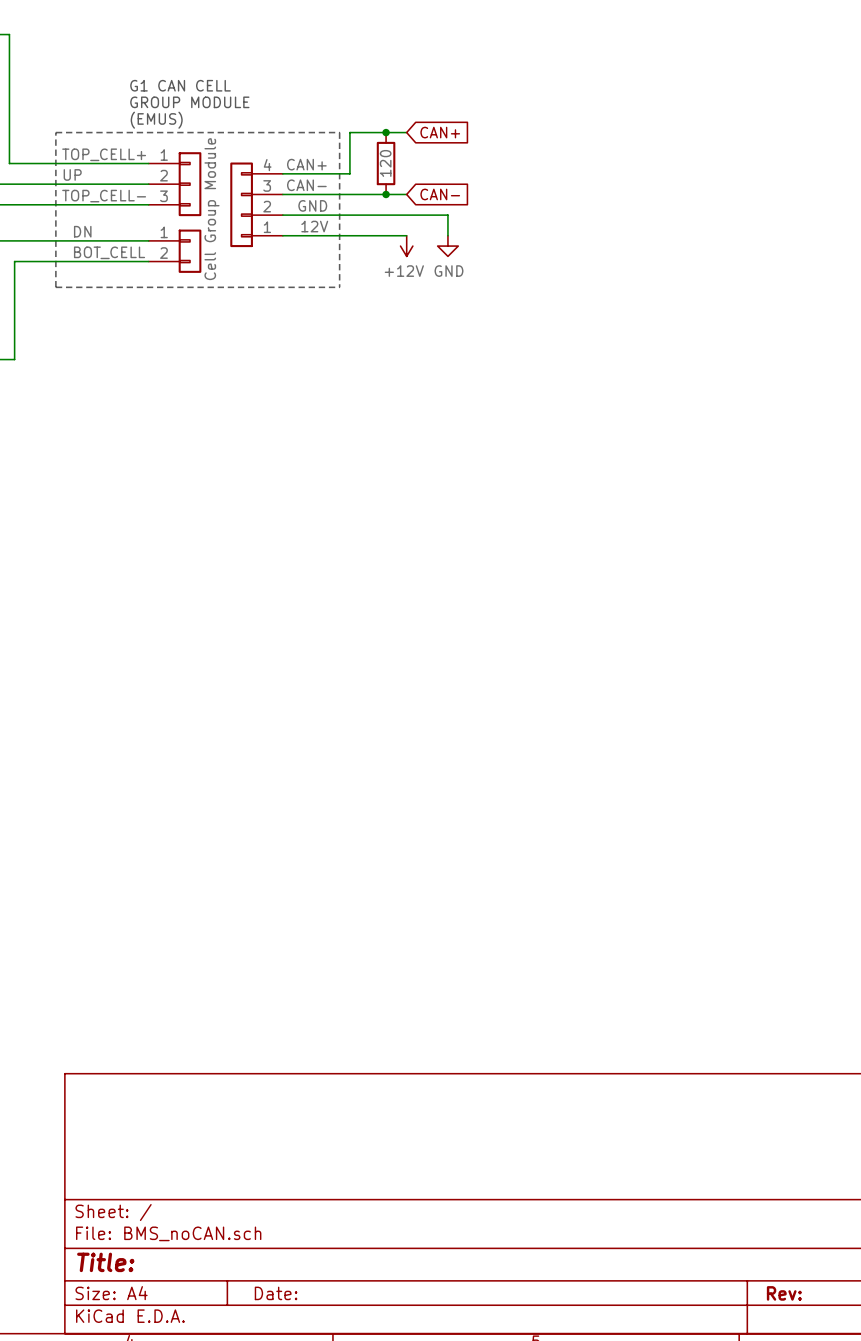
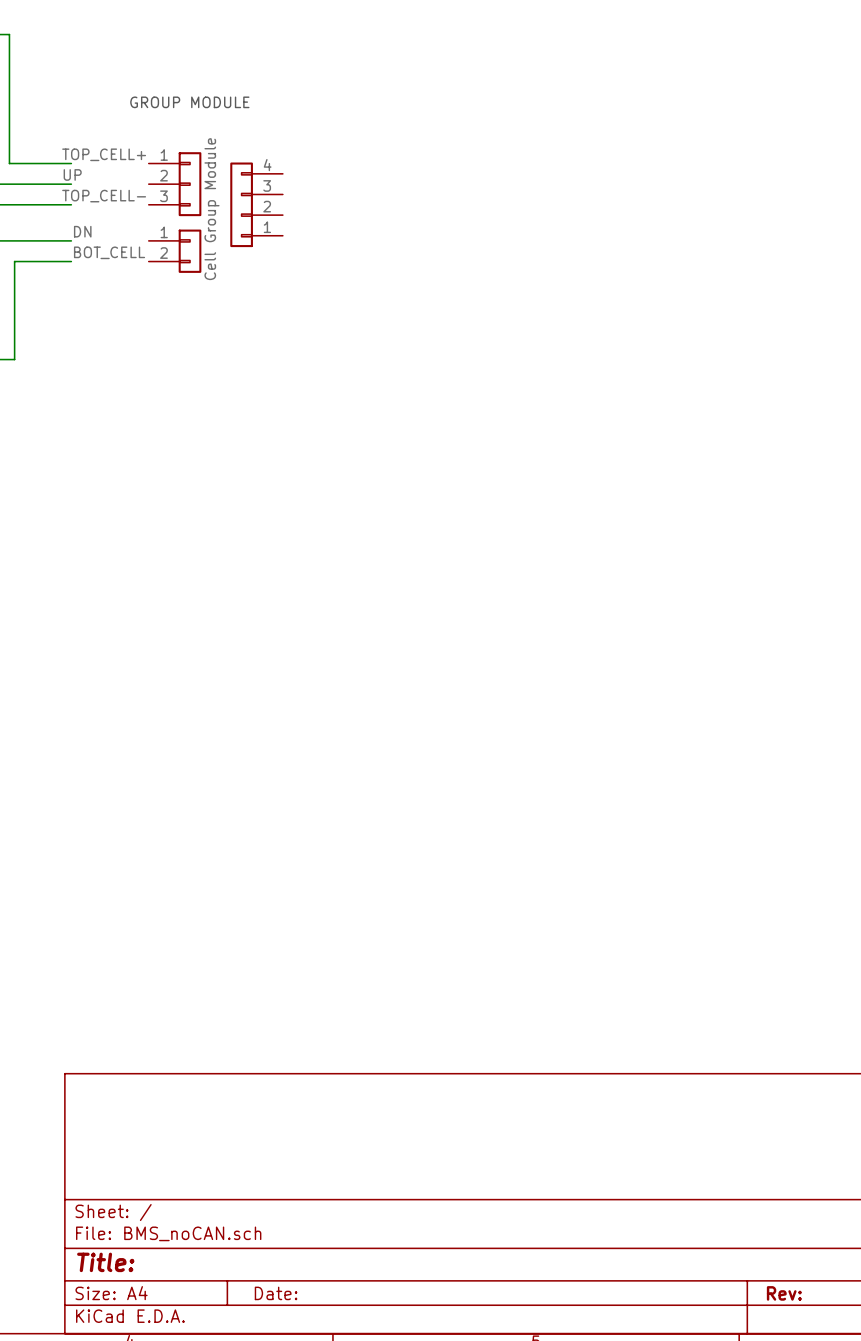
text: G1 CAN CELL (180, 85) -> none
text: (EMUS) (156, 120) -> none
line: (55, 132) (55, 287) (339, 287) (339, 132) (55, 132) -> none
junction: (386, 132) -> none
wire: (406, 132) (349, 132) (349, 173) (282, 173) -> none
global label: CAN+ (440, 132) -> none
wire: (71, 163) (148, 163) -> none
part: 120 (386, 163) -> none
label: CAN+ (306, 164) -> none
wire: (71, 184) (148, 184) -> none
label: CAN- (306, 185) -> none
wire: (282, 194) (406, 194) -> none
junction: (386, 194) -> none
global label: CAN- (440, 194) -> none
wire: (71, 204) (148, 204) -> none
label: GND (312, 205) -> none
wire: (282, 215) (447, 215) (447, 235) -> none
label: 12V (314, 226) -> none
wire: (282, 235) (406, 235) -> none
wire: (71, 240) (148, 240) -> none
power symbol: +12V (406, 246) -> none
power symbol: GND (447, 246) -> none
wire: (71, 261) (148, 261) -> none

